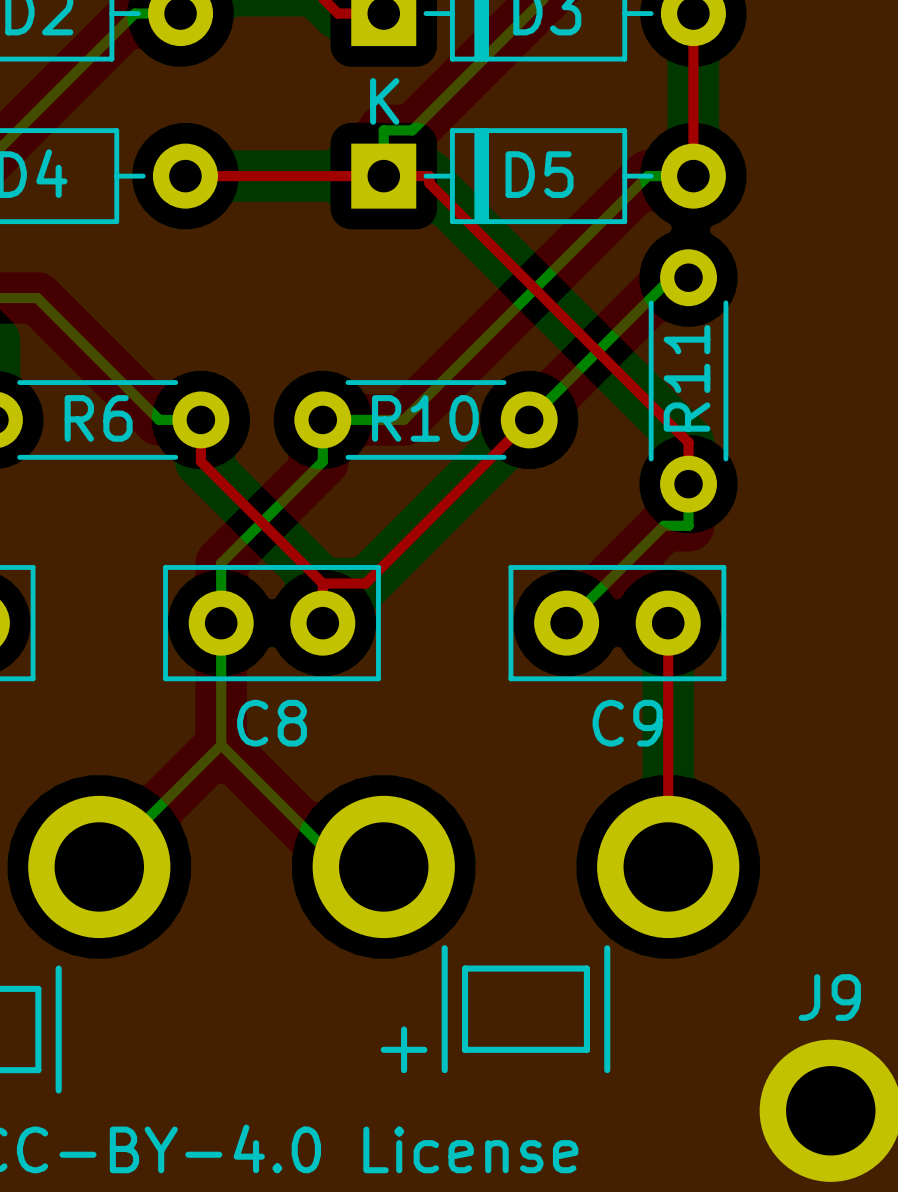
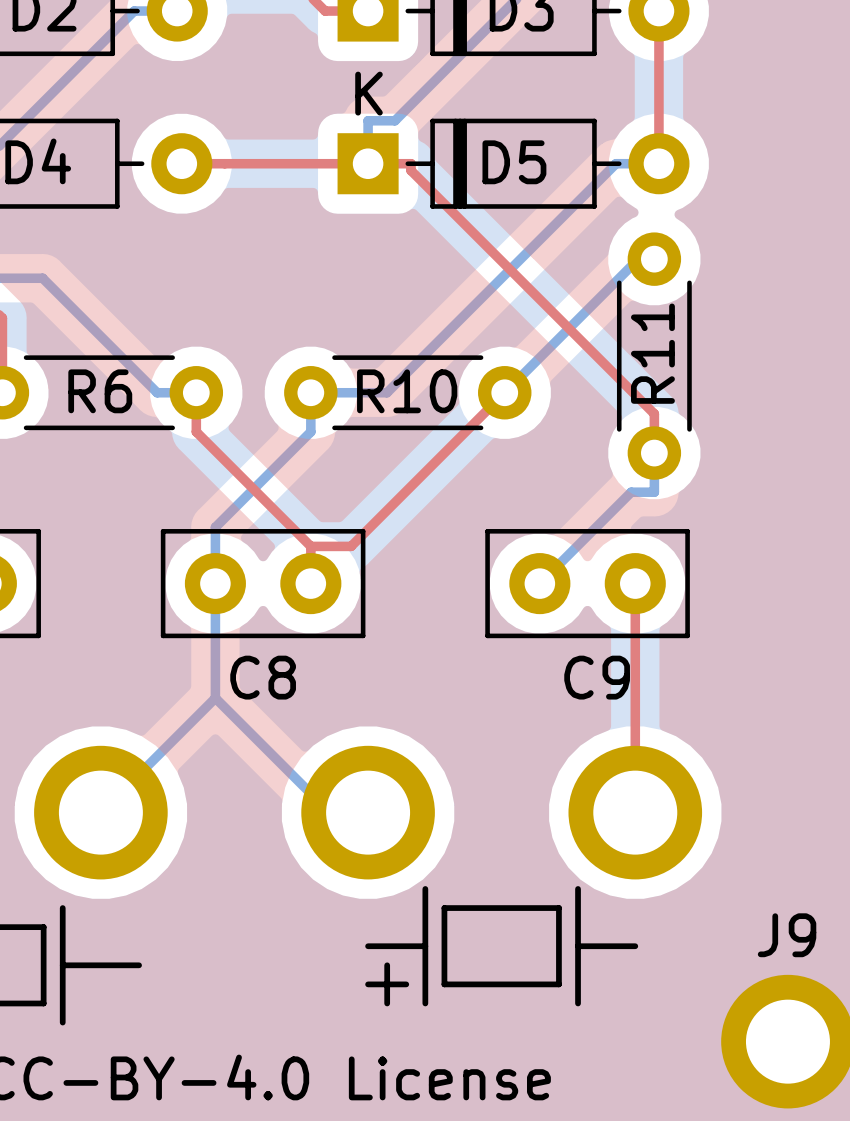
line: none -> (368, 946) (425, 946)
line: none -> (578, 946) (635, 946)
line: none -> (62, 965) (139, 965)

